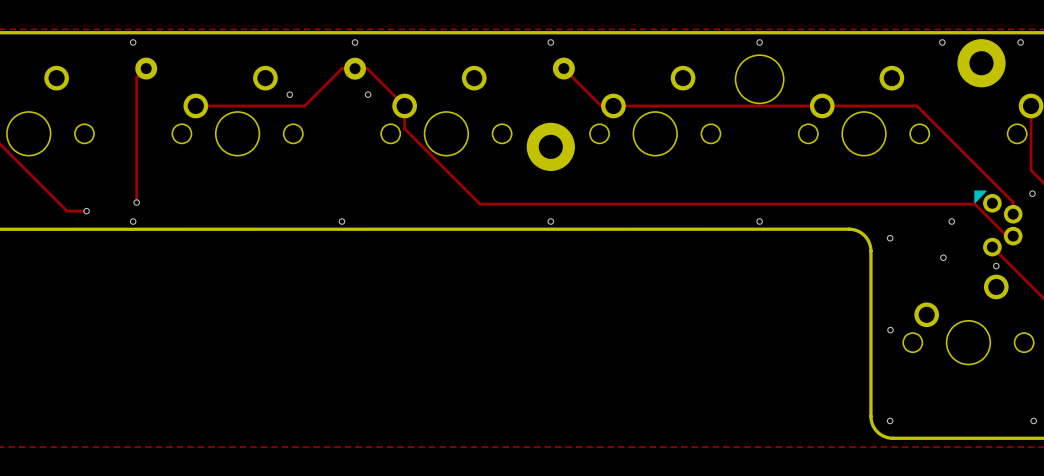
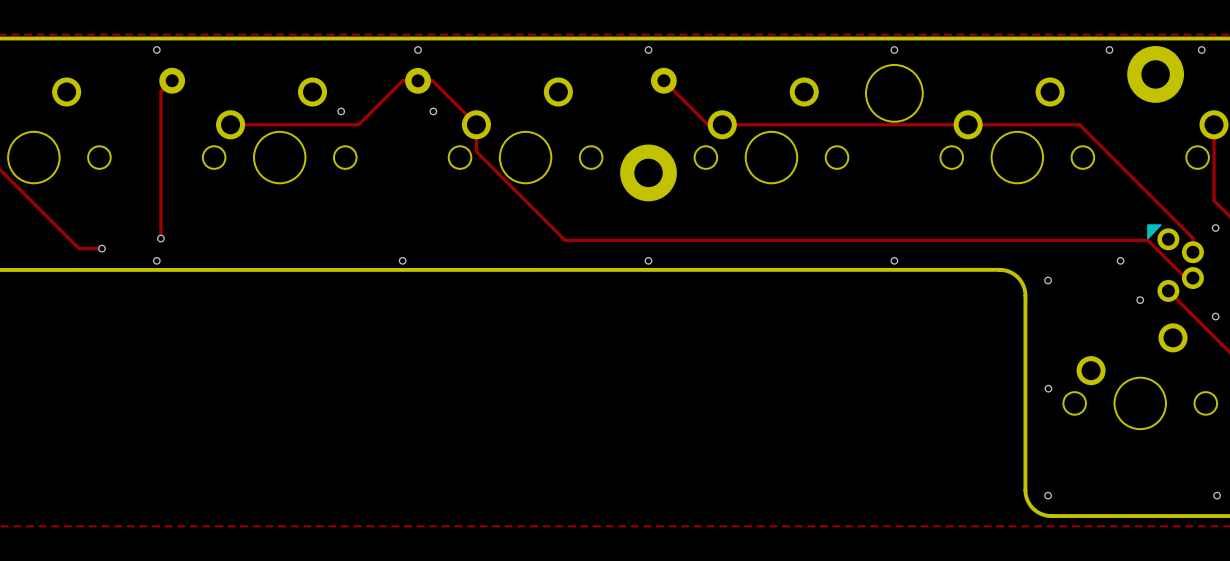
via: none -> (1140, 300)
via: (943, 257) -> none
via: (996, 266) -> none
via: none -> (1215, 316)

